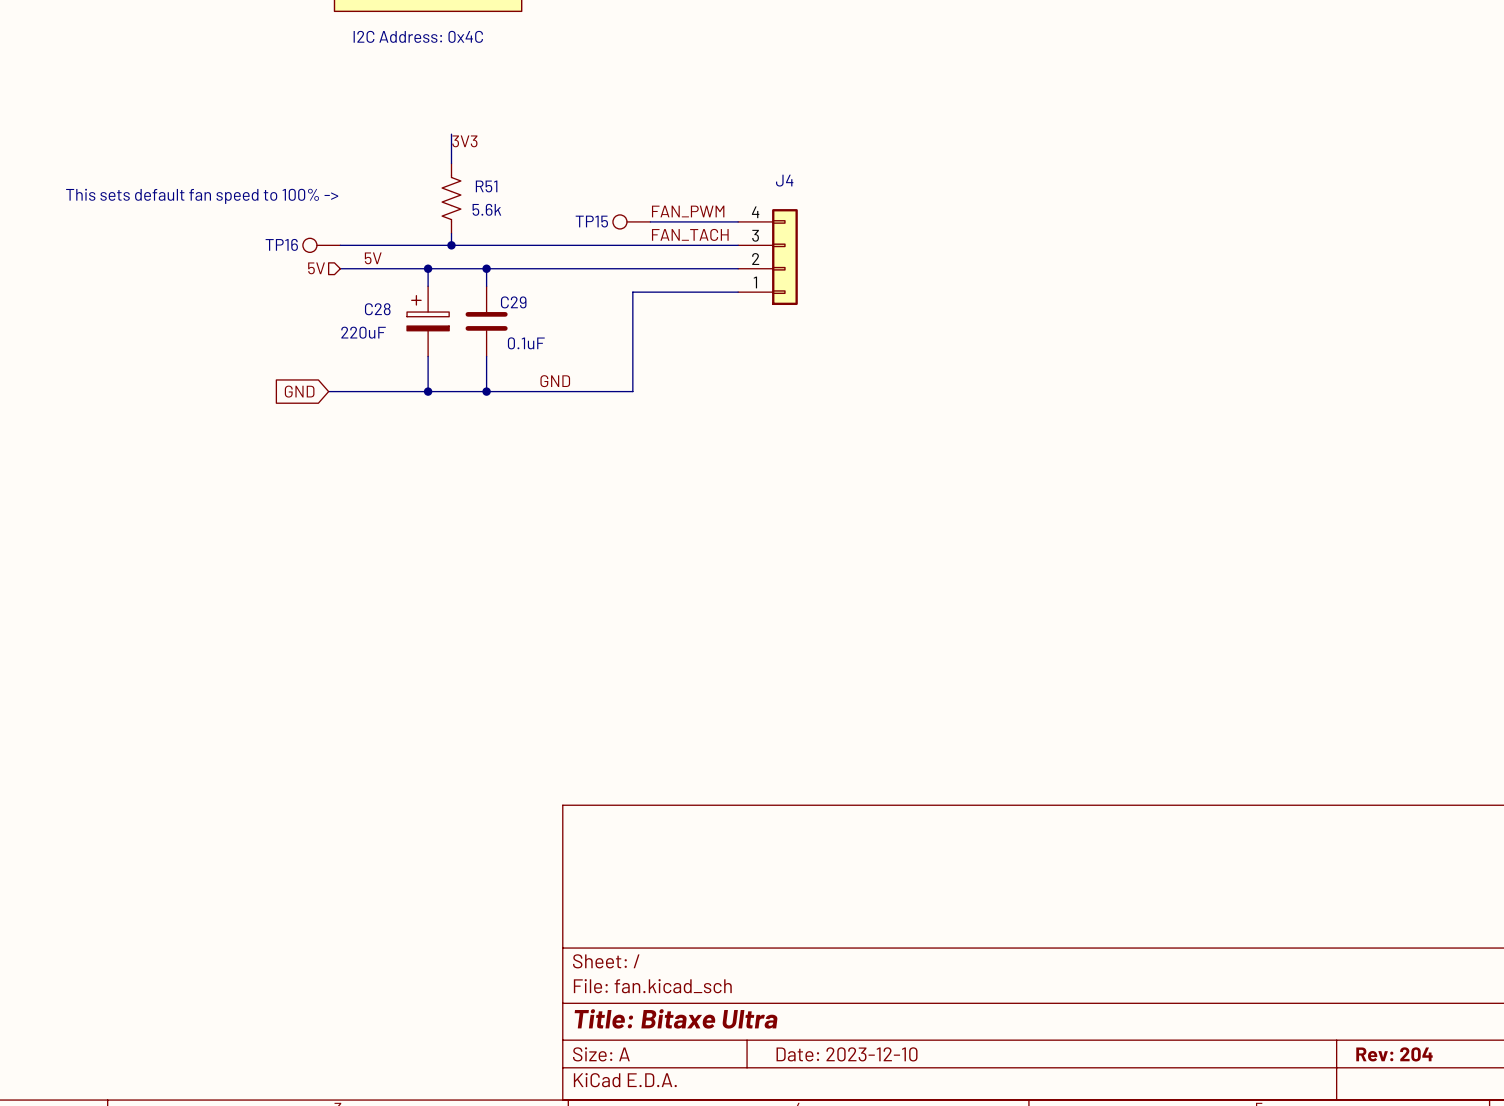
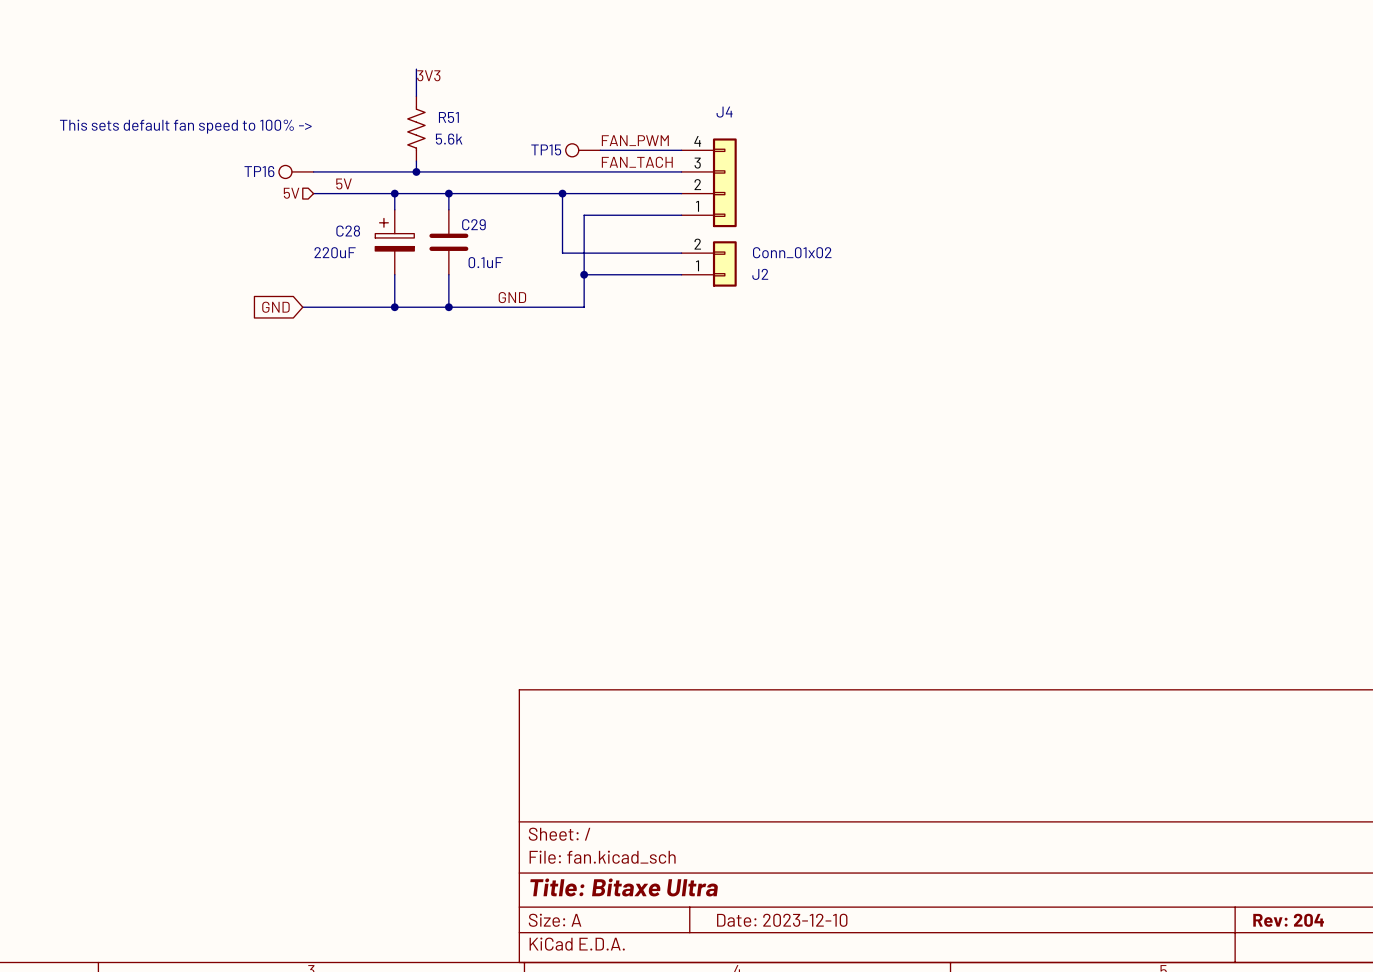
wire: none -> (562, 193) (562, 253) (681, 253)
junction: none -> (562, 193)
J2: none -> Conn_01x02 (709, 263)
wire: none -> (584, 274) (681, 274)
junction: none -> (584, 274)

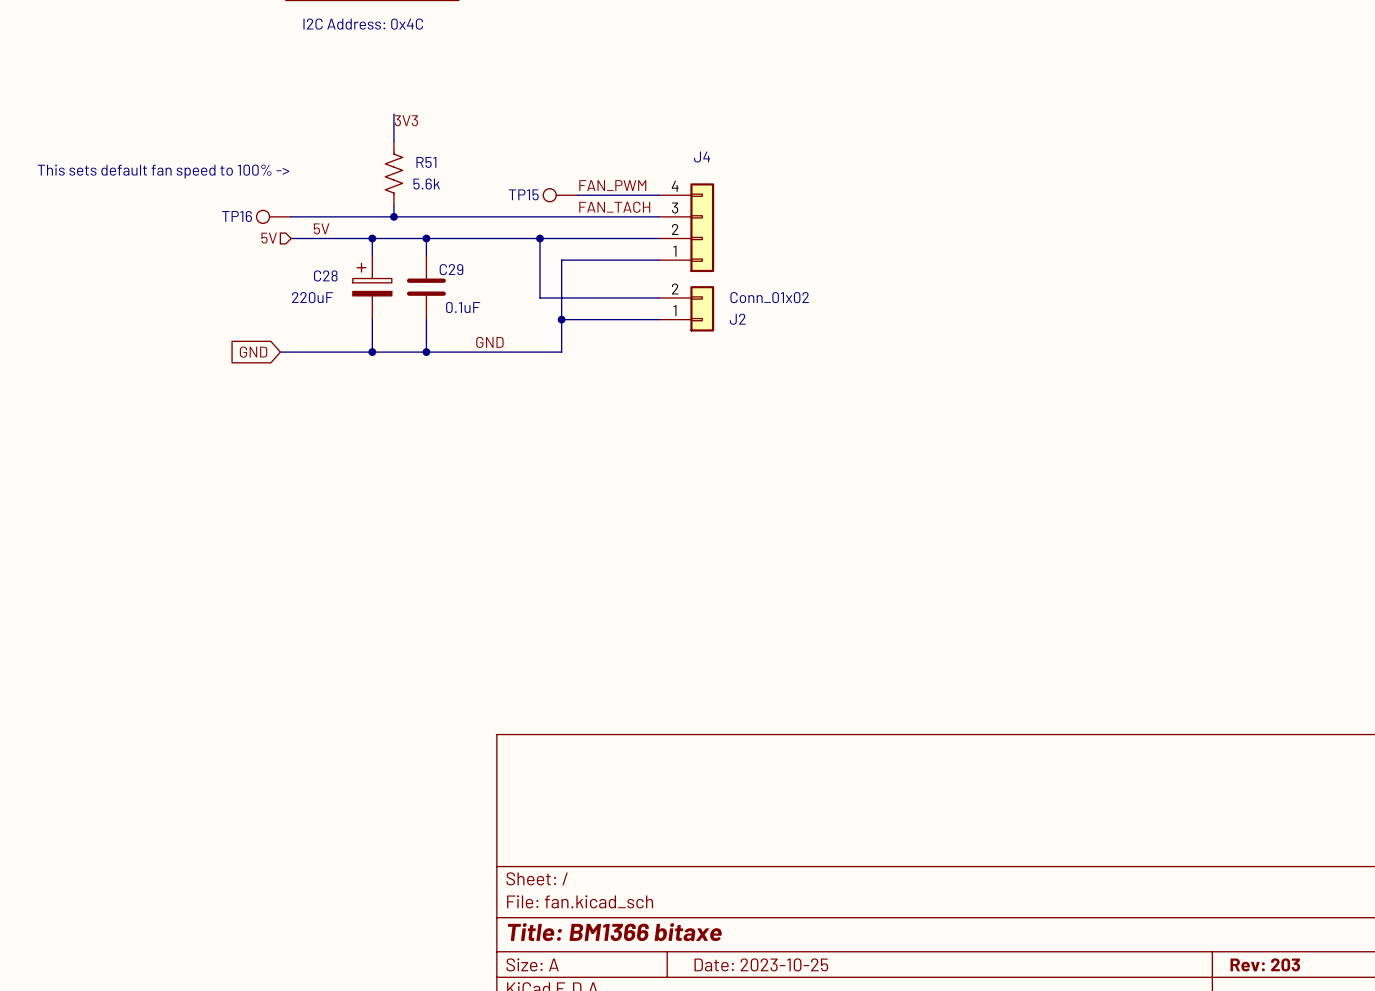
title block: Title: Bitaxe Ultra (624, 887) -> Title: BM1366 bitaxe (614, 932)
title block: Date: 2023-12-10 (782, 920) -> Date: 2023-10-25 (761, 964)
title block: Rev: 204 (1288, 920) -> Rev: 203 (1265, 964)

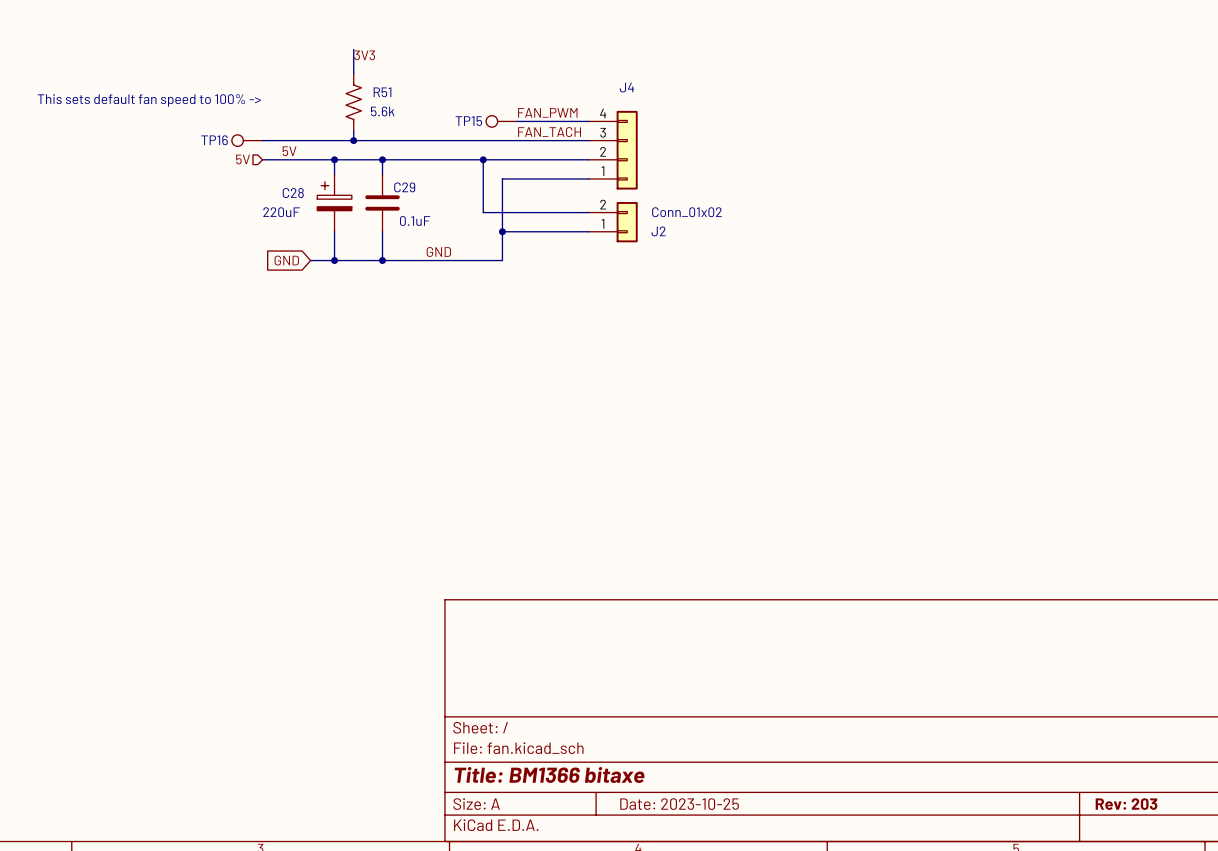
global label position: GND (253, 352) -> GND (286, 260)
wire: (280, 352) (345, 352) -> none

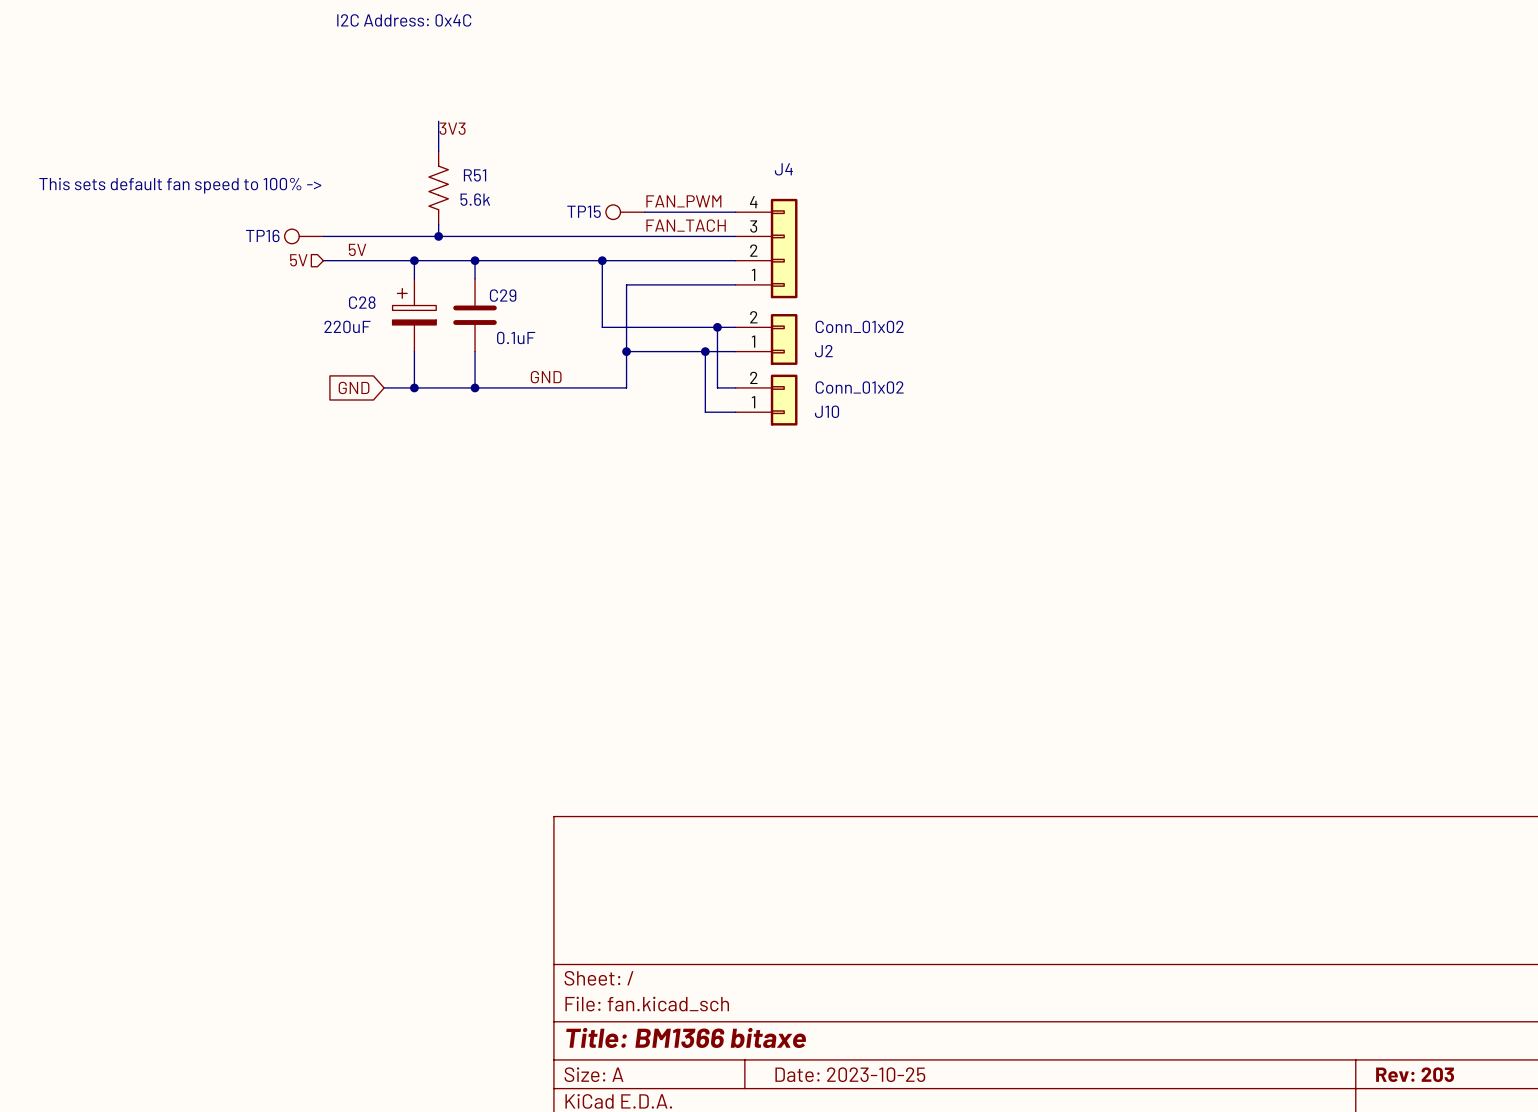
wire: none -> (717, 327) (717, 387) (735, 387)
junction: none -> (717, 327)
wire: none -> (705, 351) (705, 412) (735, 412)
junction: none -> (705, 351)
J10: none -> Conn_01x02 (766, 400)

